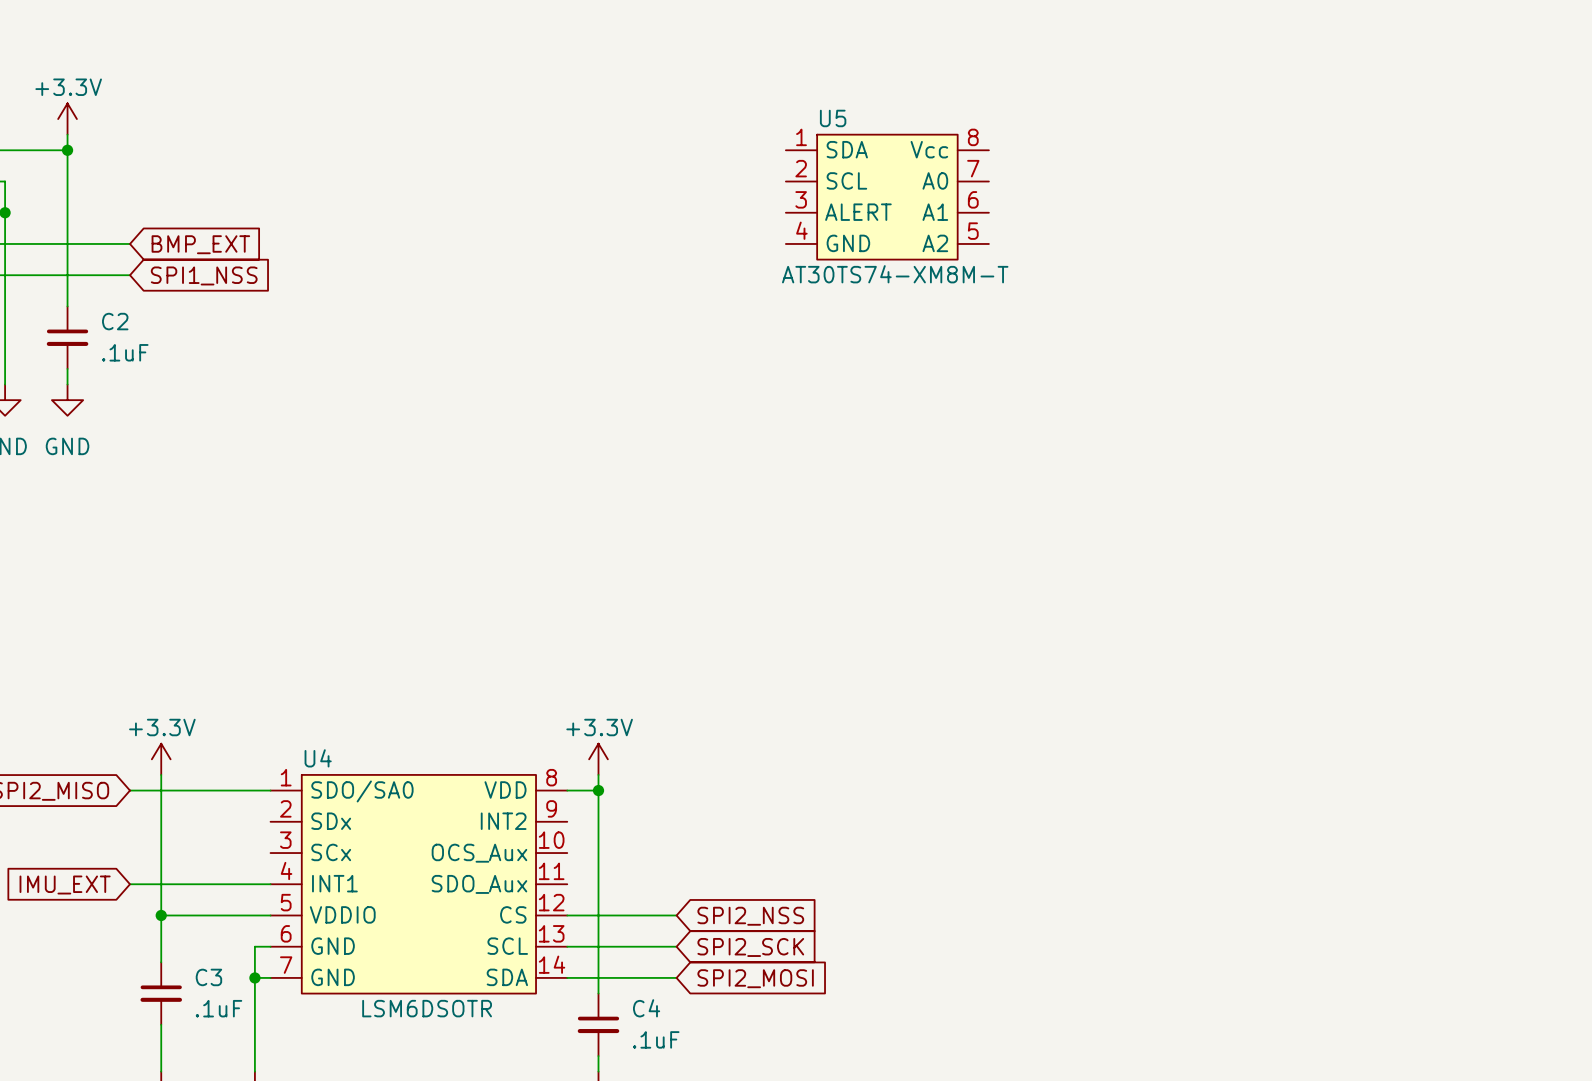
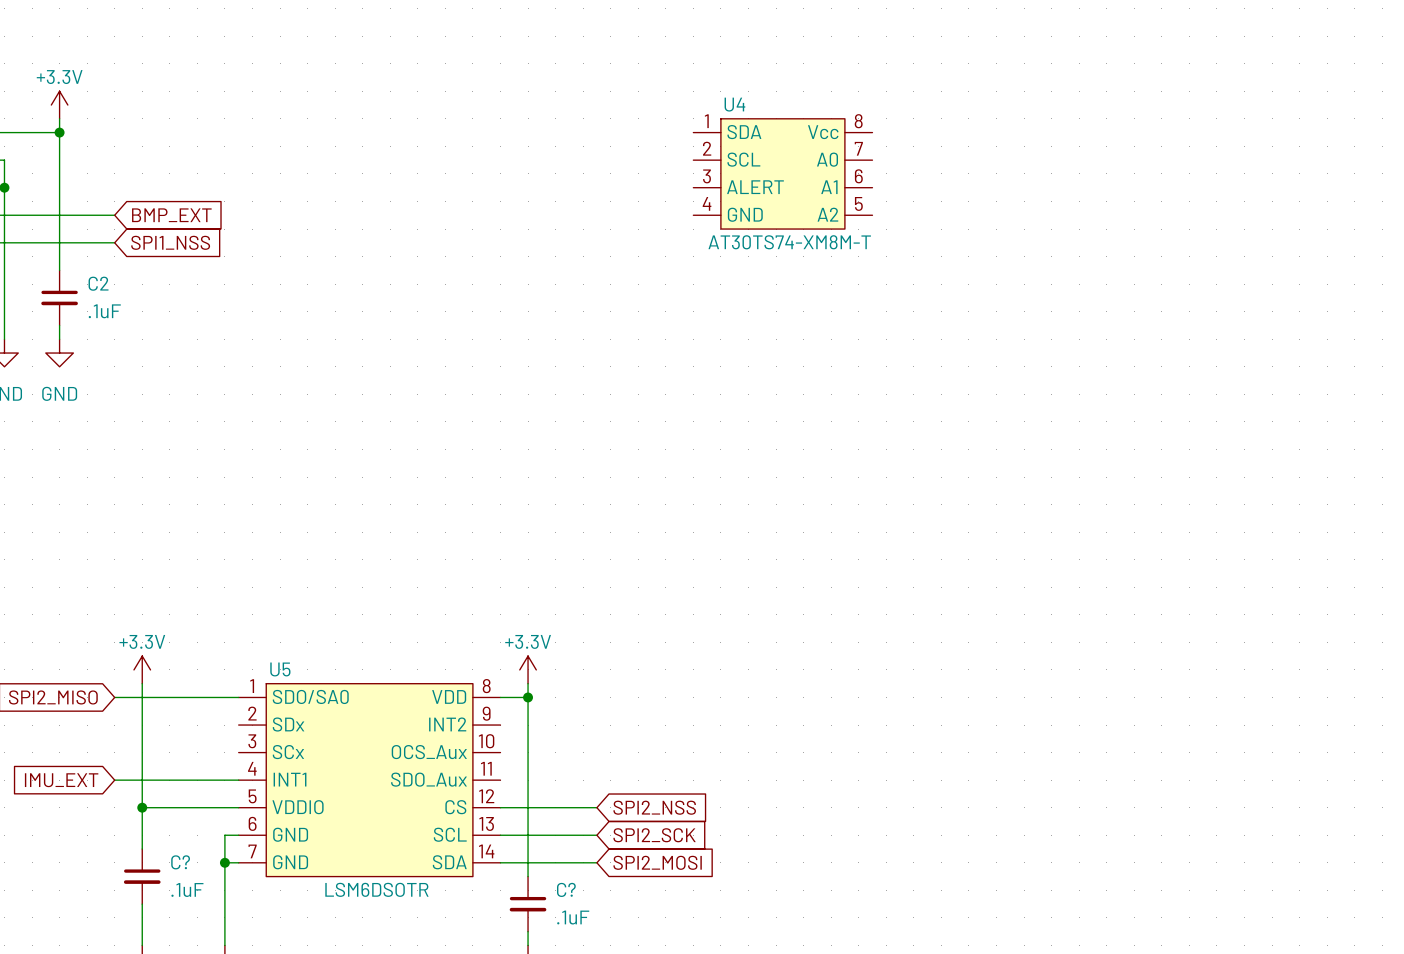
U5 name: U5 (833, 118) -> U4 (734, 104)
U4 name: U4 (318, 758) -> U5 (280, 669)
C3 name: C3 (208, 977) -> C? (180, 862)
C4 name: C4 (646, 1008) -> C? (566, 889)

